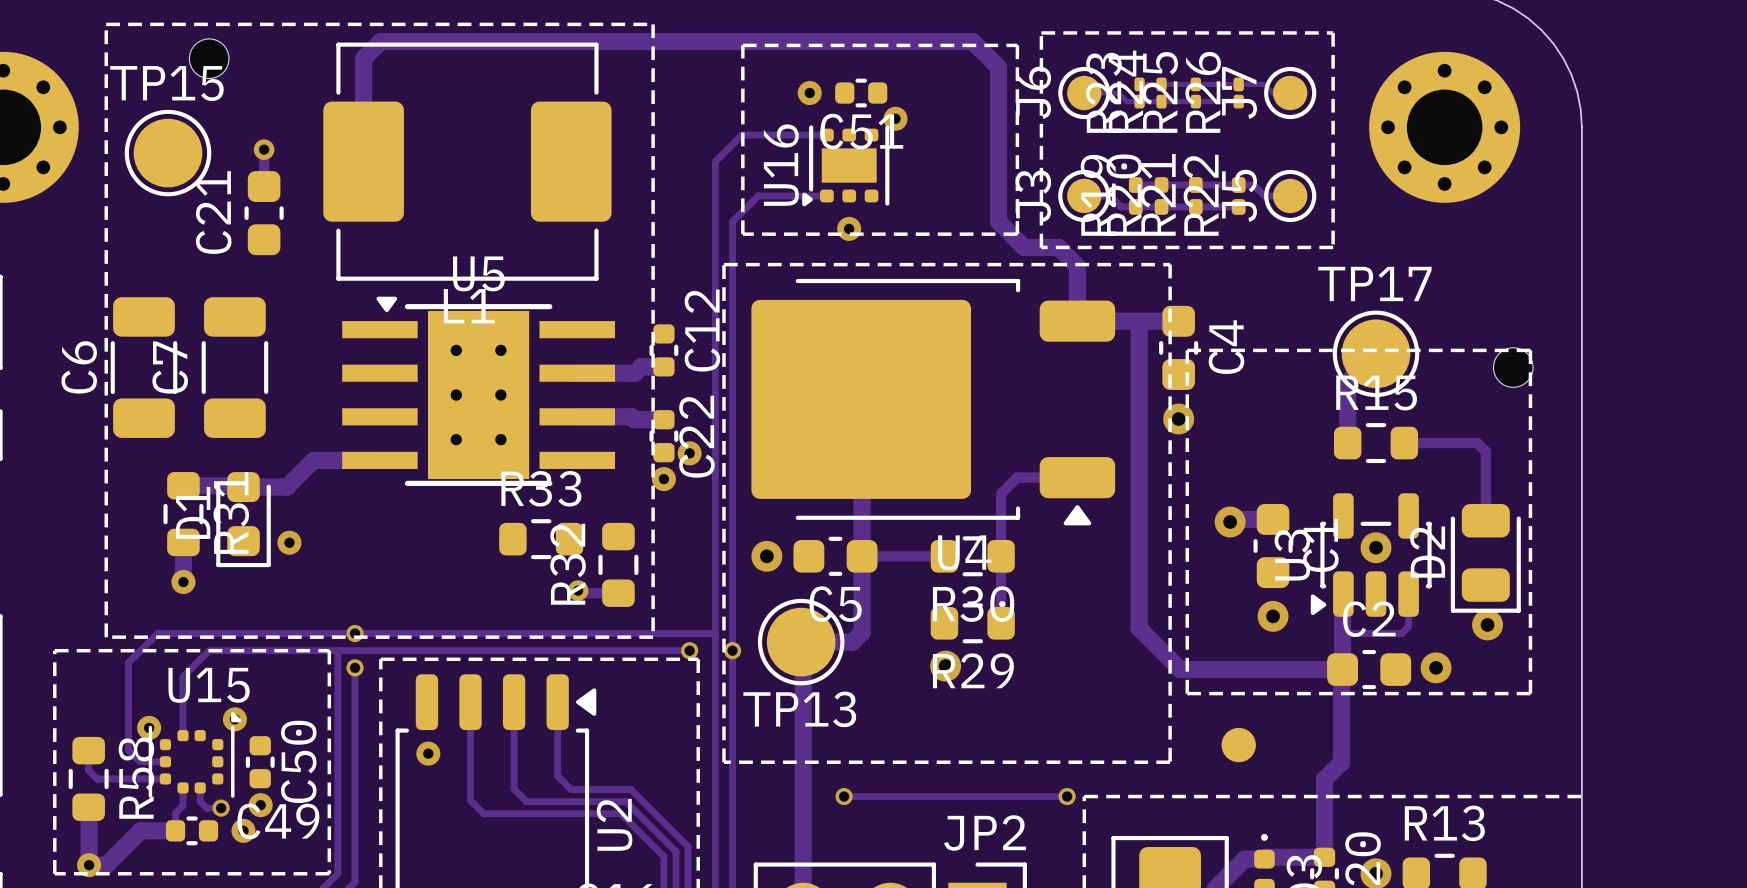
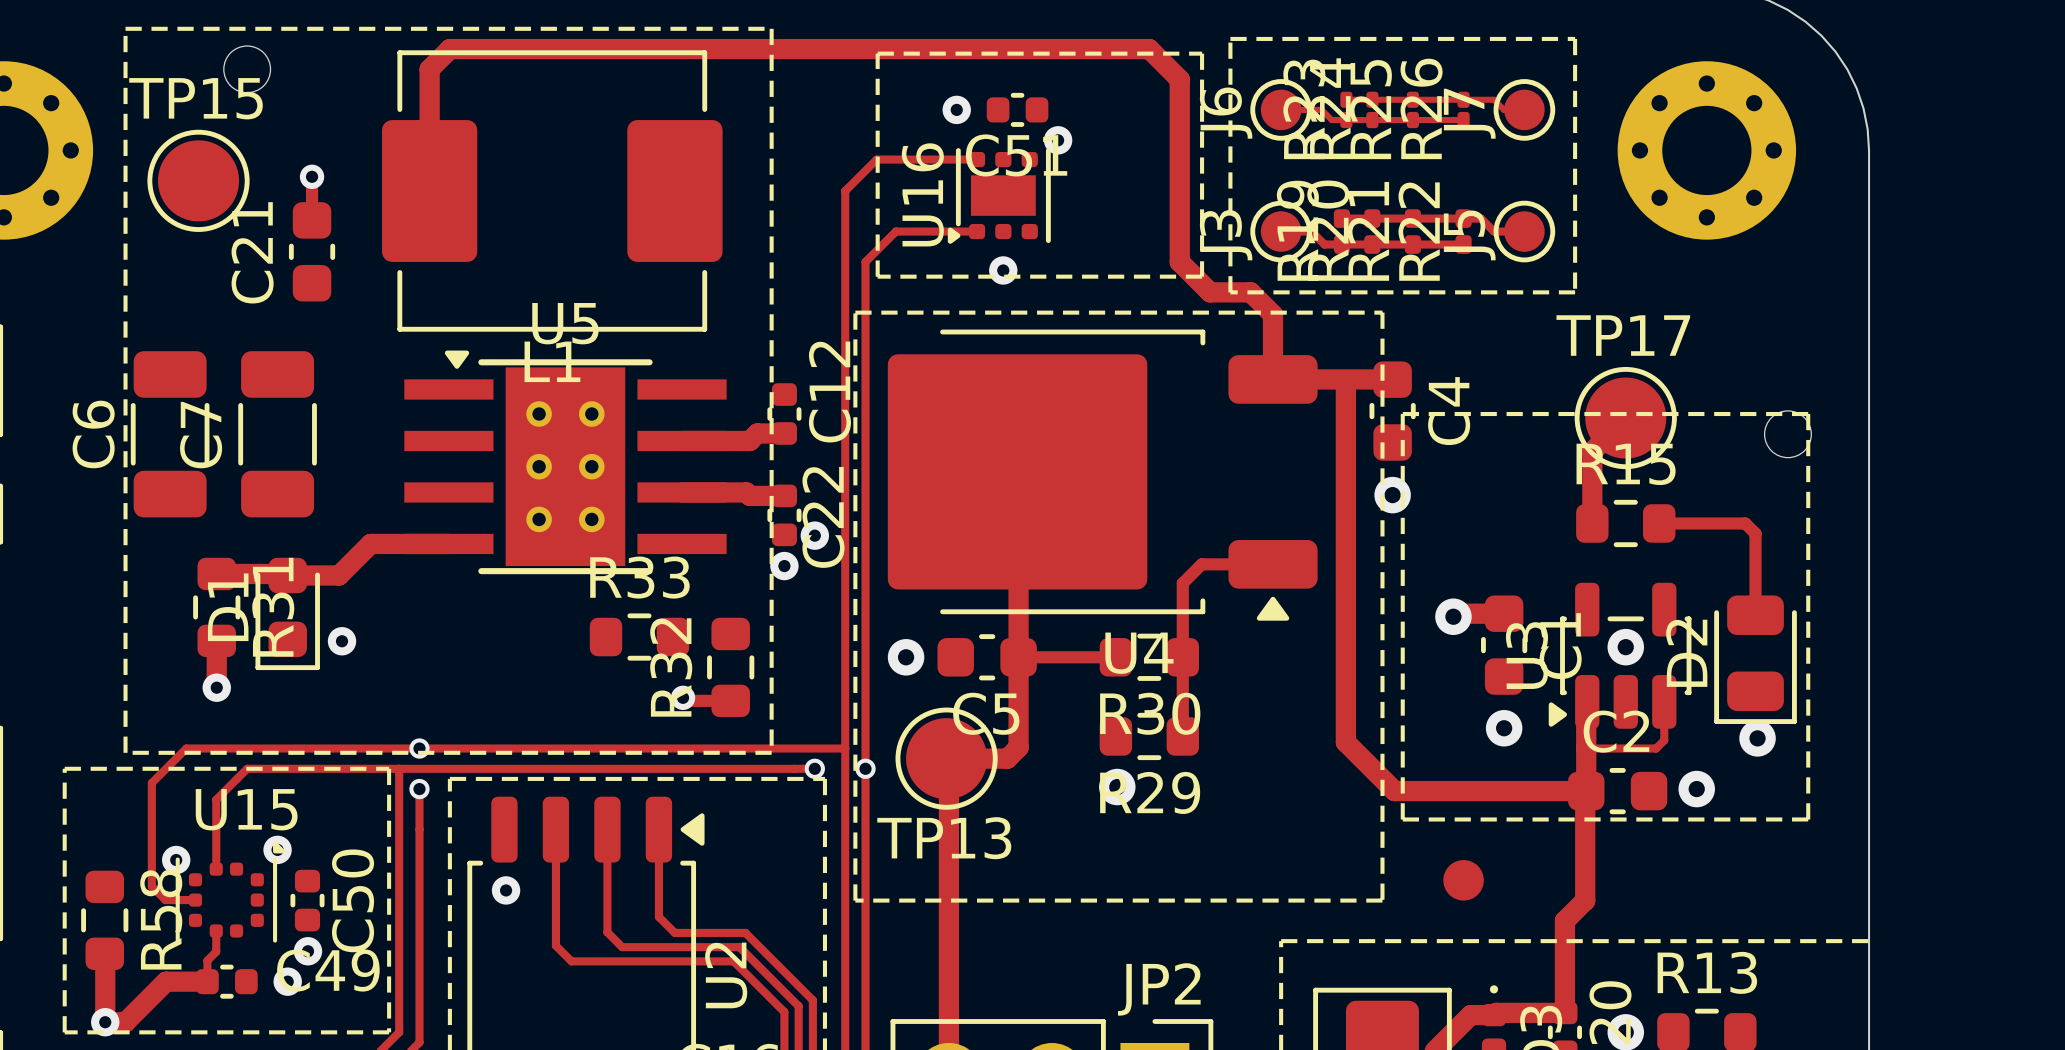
track: (88, 750) (88, 770) (97, 779) -> none
track: (98, 778) (165, 778) -> none
track: (200, 787) (200, 801) (206, 808) (221, 808) -> none
track: (844, 796) (1067, 796) -> none
via: (844, 796) -> none
via: (1067, 796) -> none
via: (221, 808) -> none

